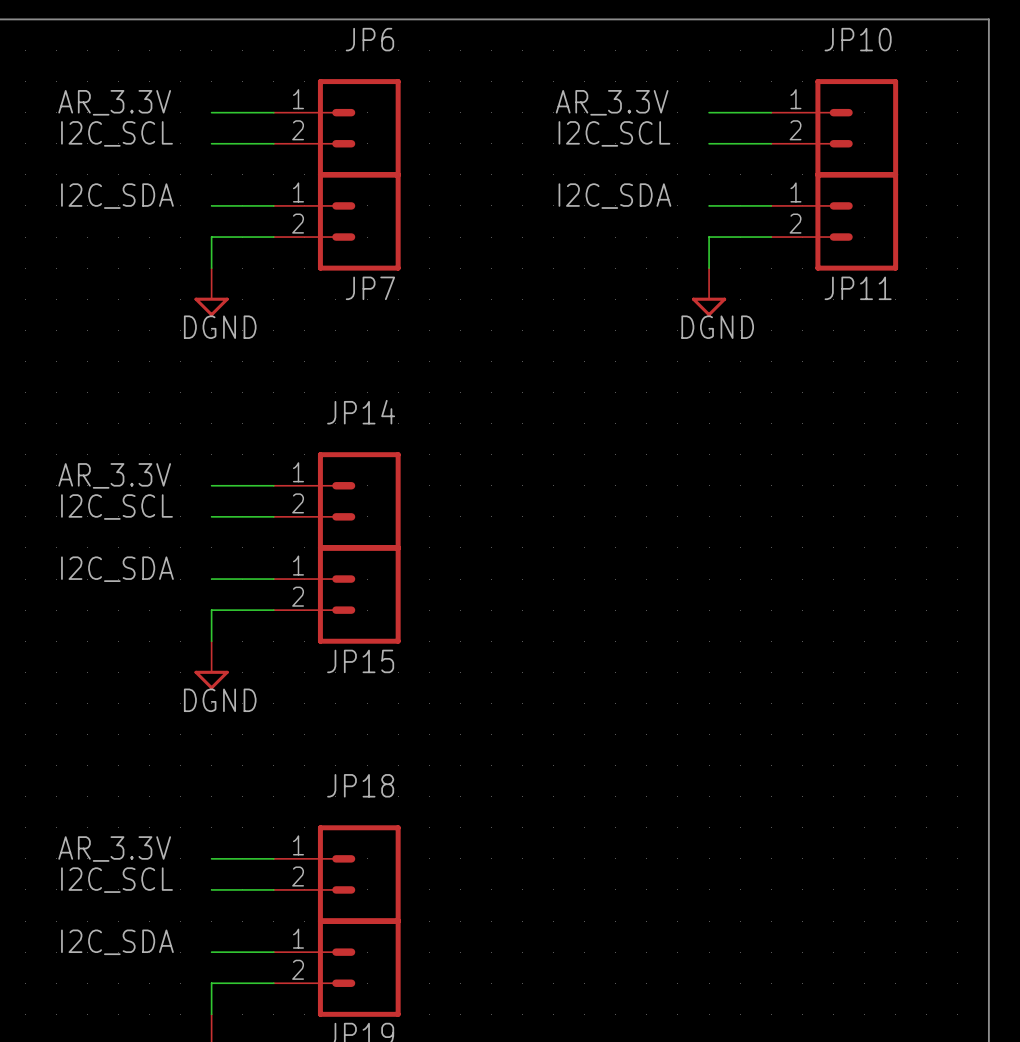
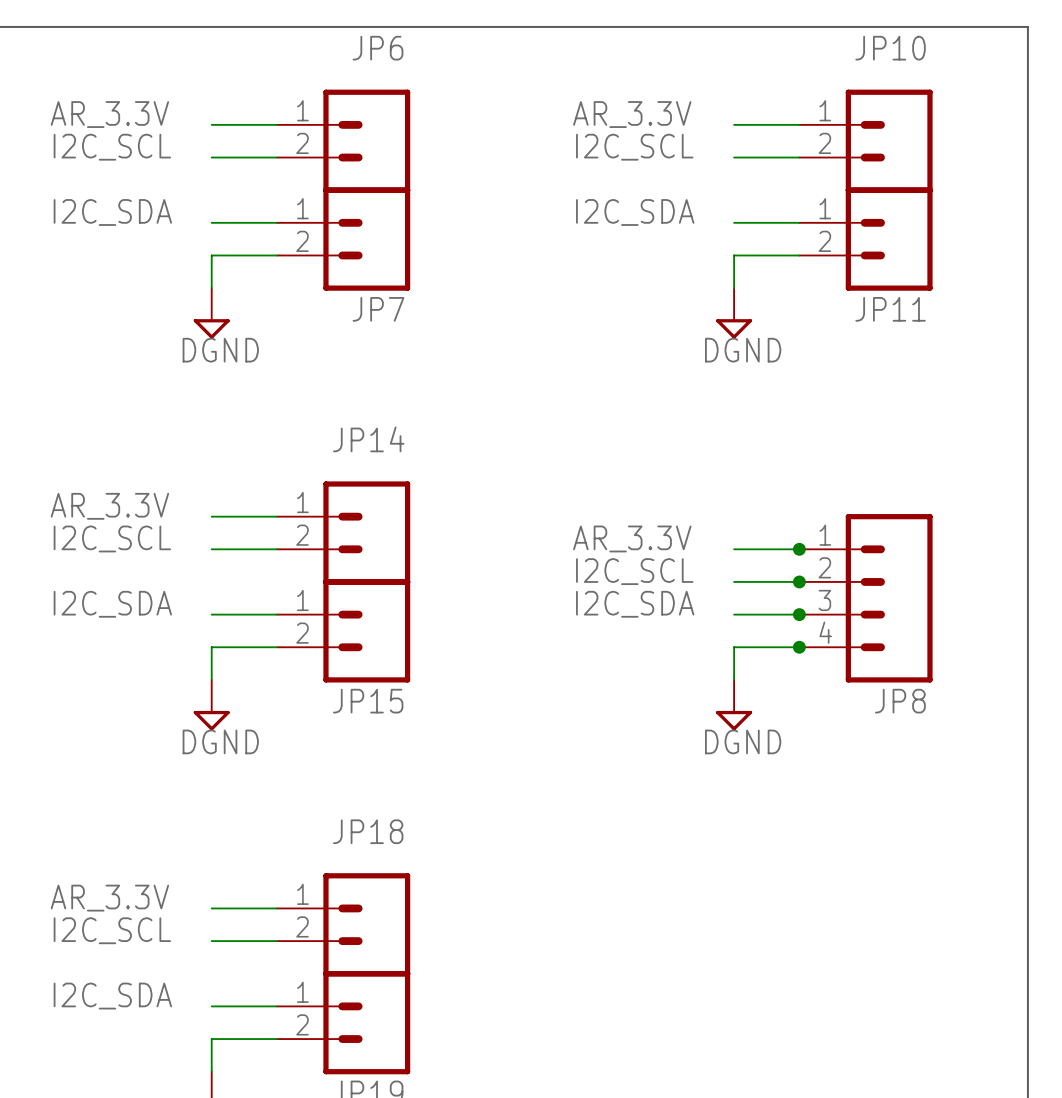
label: none -> AR_3.3V (632, 538)
wire: none -> (734, 549) (799, 549)
junction: none -> (799, 549)
label: none -> I2C_SCL (634, 571)
wire: none -> (734, 581) (799, 581)
junction: none -> (799, 581)
JP8: none -> (865, 598)
label: none -> I2C_SDA (635, 604)
wire: none -> (734, 614) (799, 614)
junction: none -> (799, 614)
wire: none -> (799, 647) (734, 647) (734, 679)
junction: none -> (799, 647)
power symbol: none -> DGND (734, 705)

